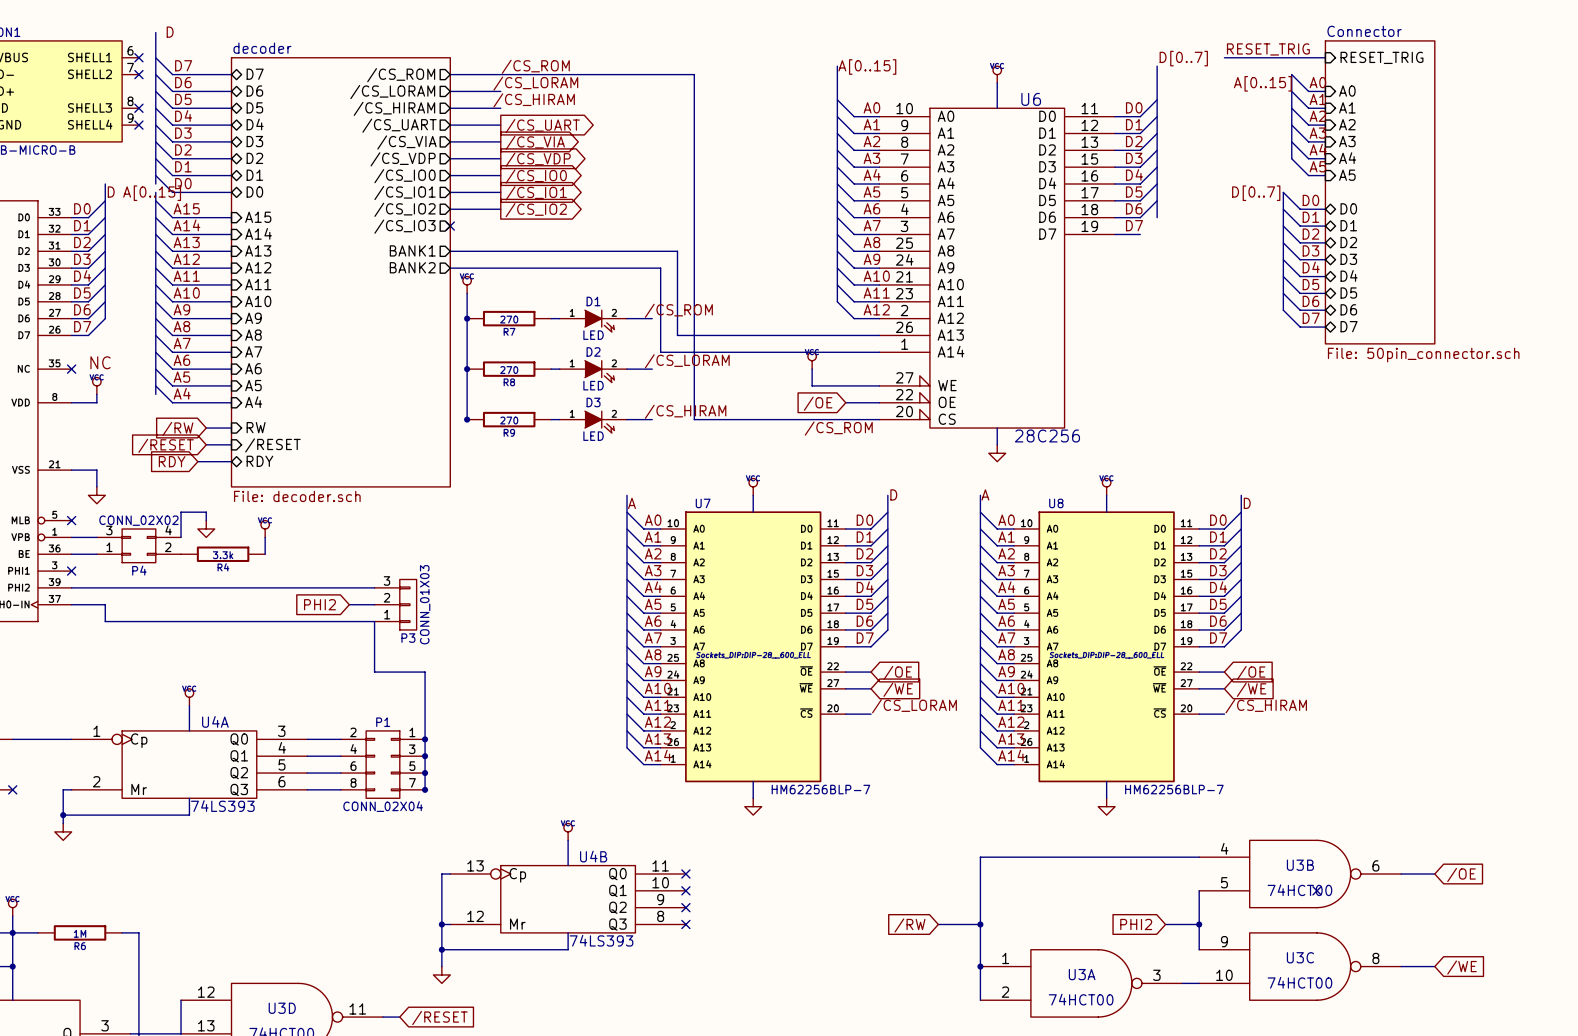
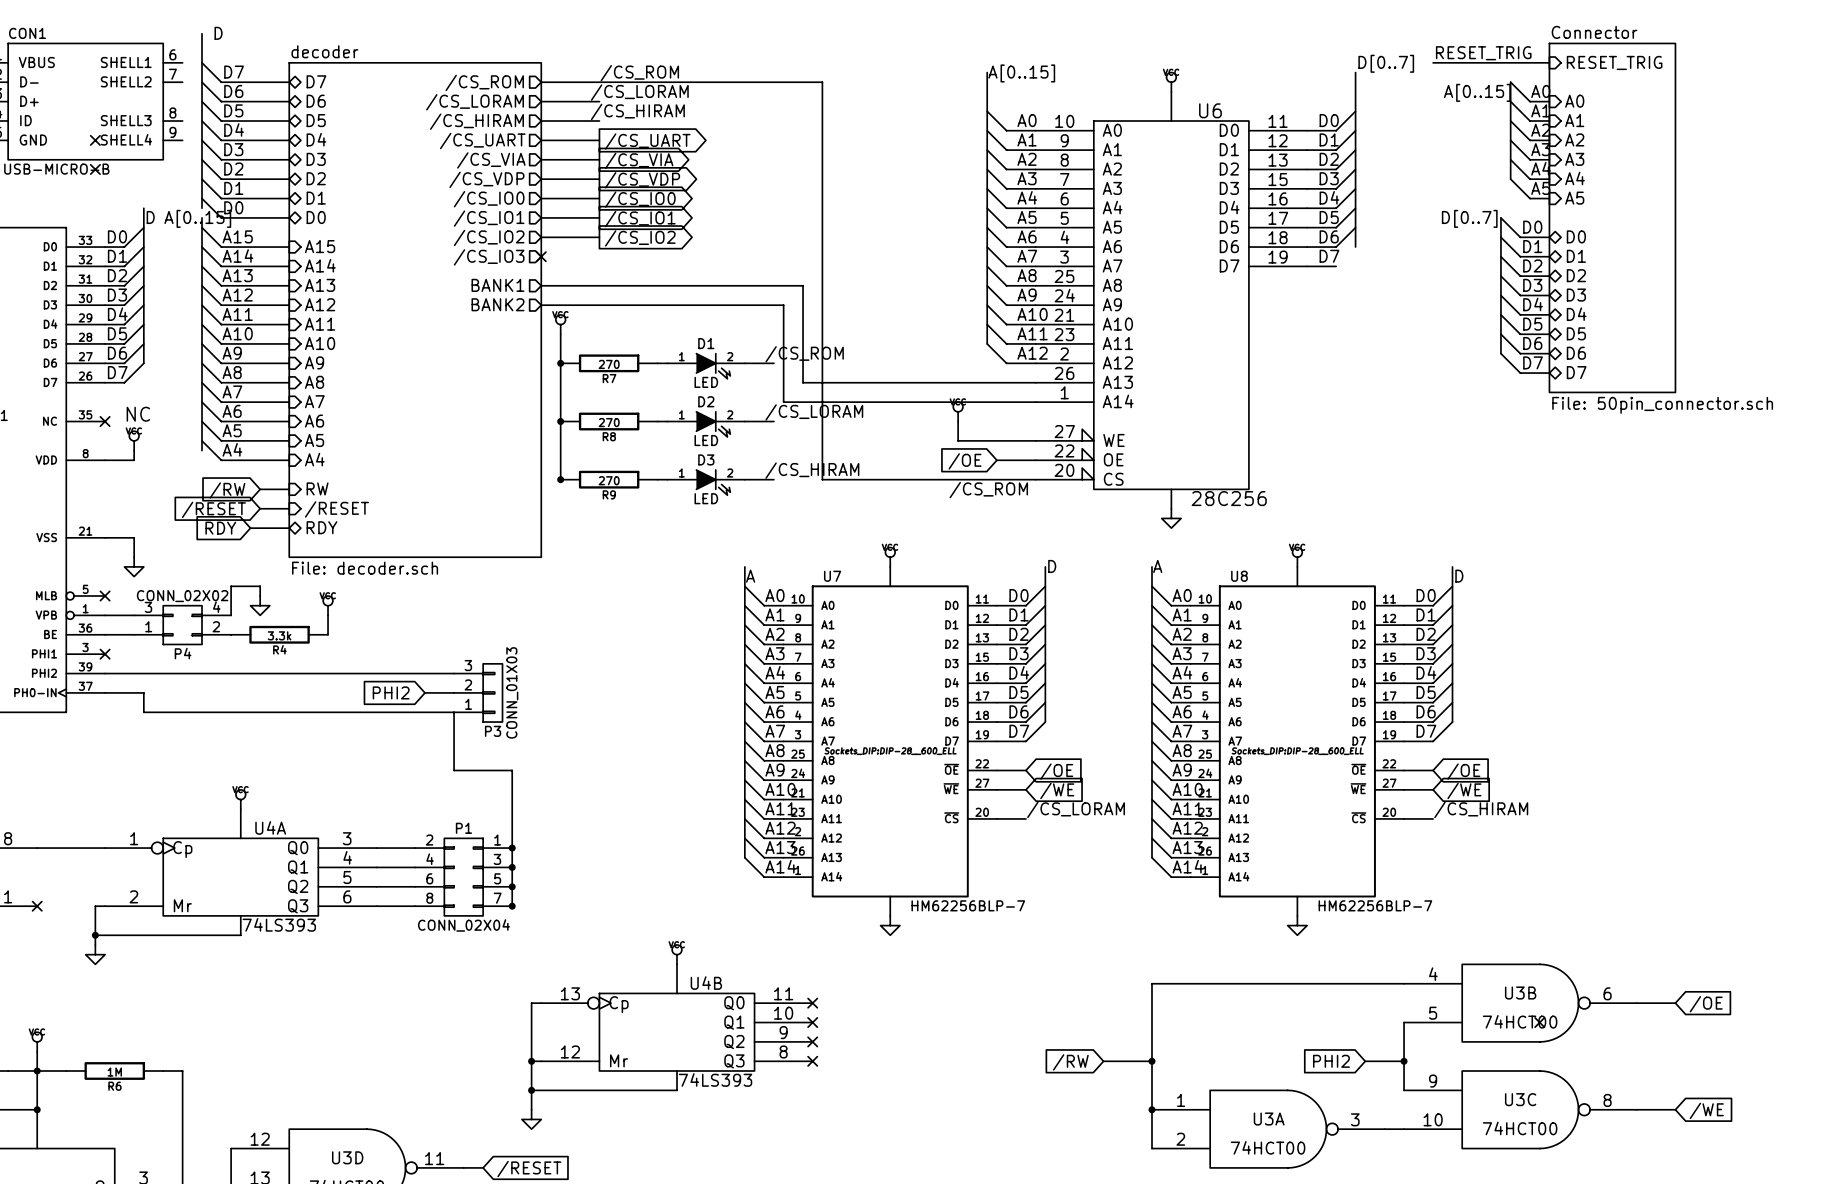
no-connect mark: (138, 57) -> none
no-connect mark: (138, 74) -> none
no-connect mark: (138, 108) -> none
no-connect mark: none -> (95, 140)
no-connect mark: (138, 125) -> none
no-connect mark: none -> (95, 169)

